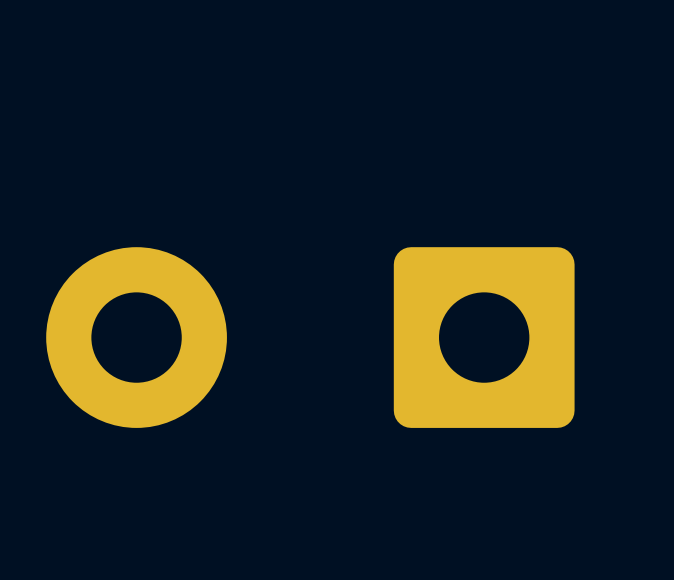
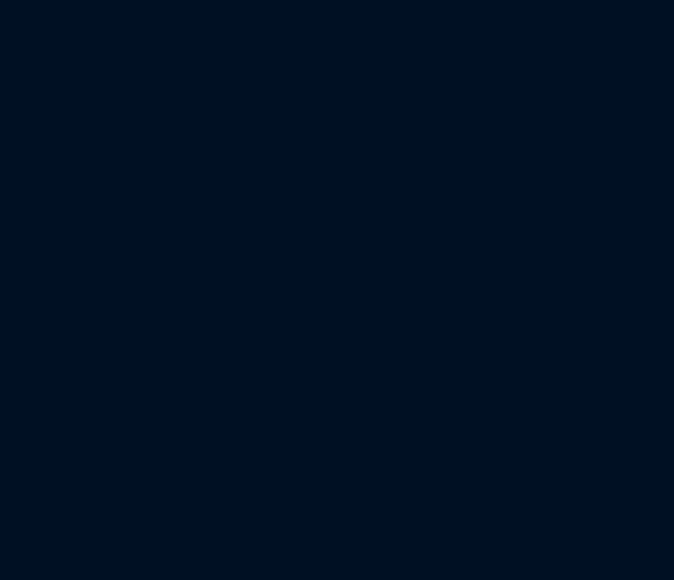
part: (310, 337) -> none

